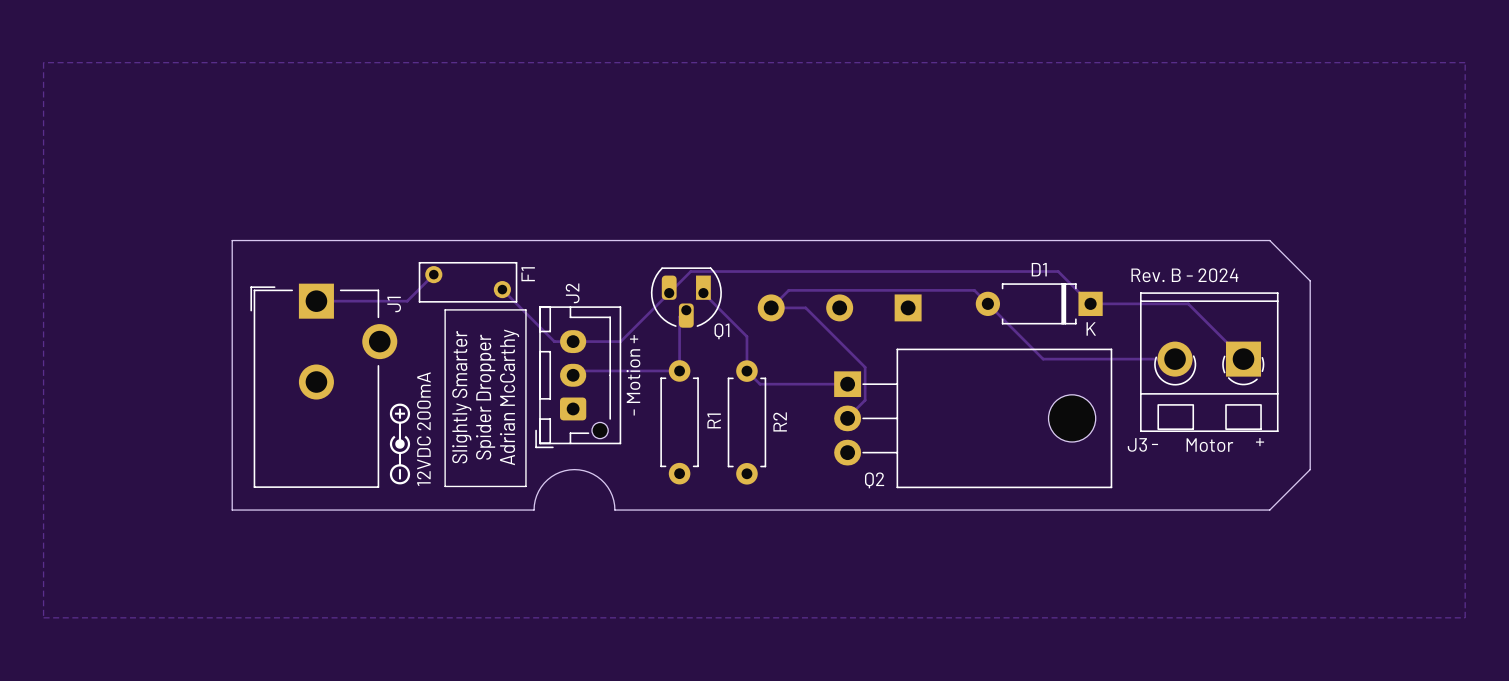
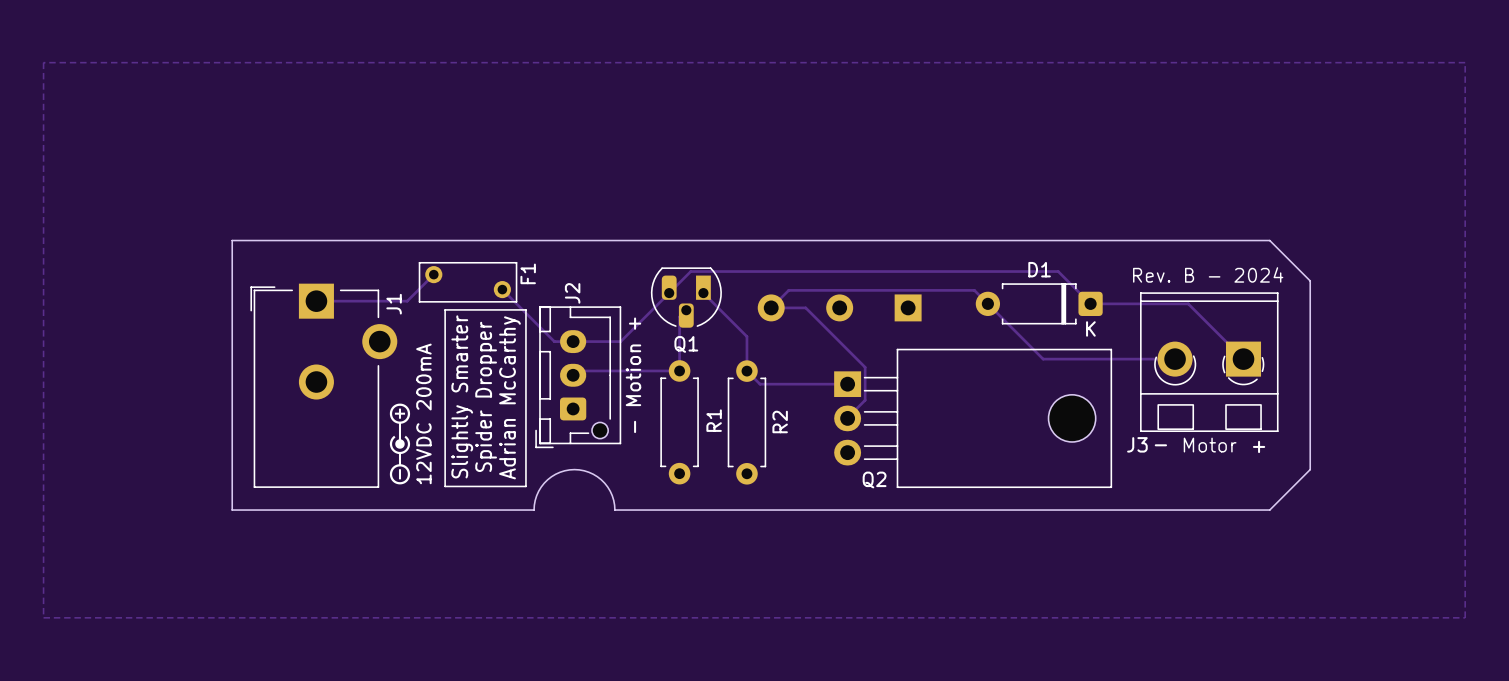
D1 footprint: [975, 283, 1103, 325] -> [975, 283, 1103, 325]
Q1 name position: Q1 (721, 331) -> Q1 (686, 344)
Q2 footprint: [834, 348, 1113, 489] -> [834, 348, 1113, 489]

